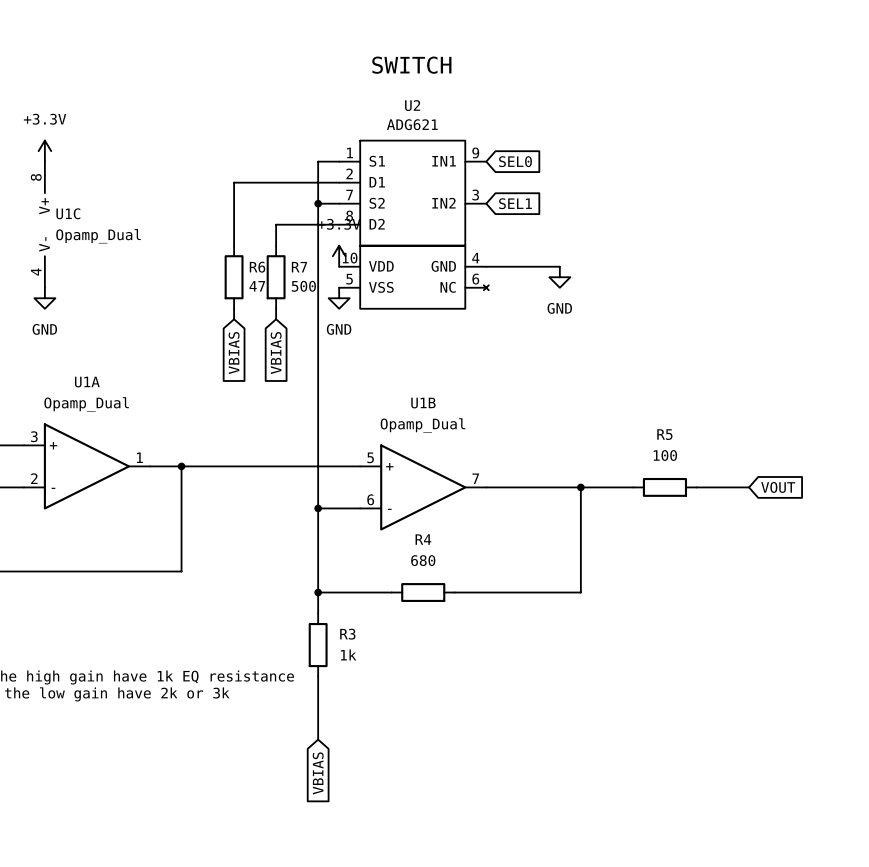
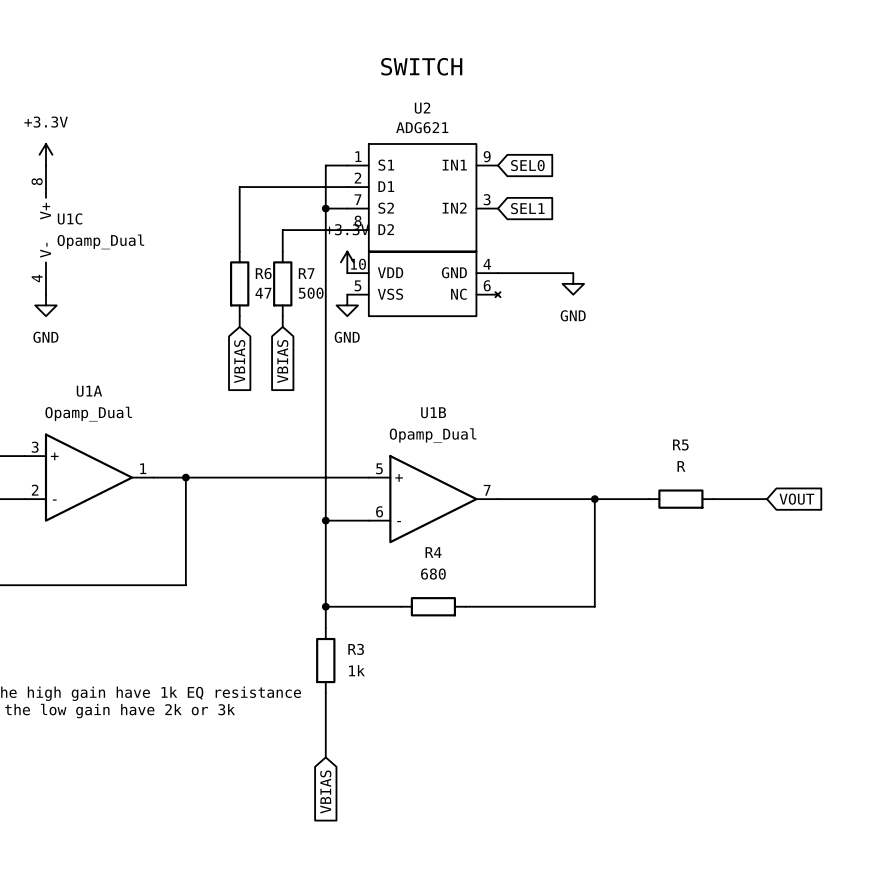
R5 value: 100 (665, 455) -> R (681, 466)

